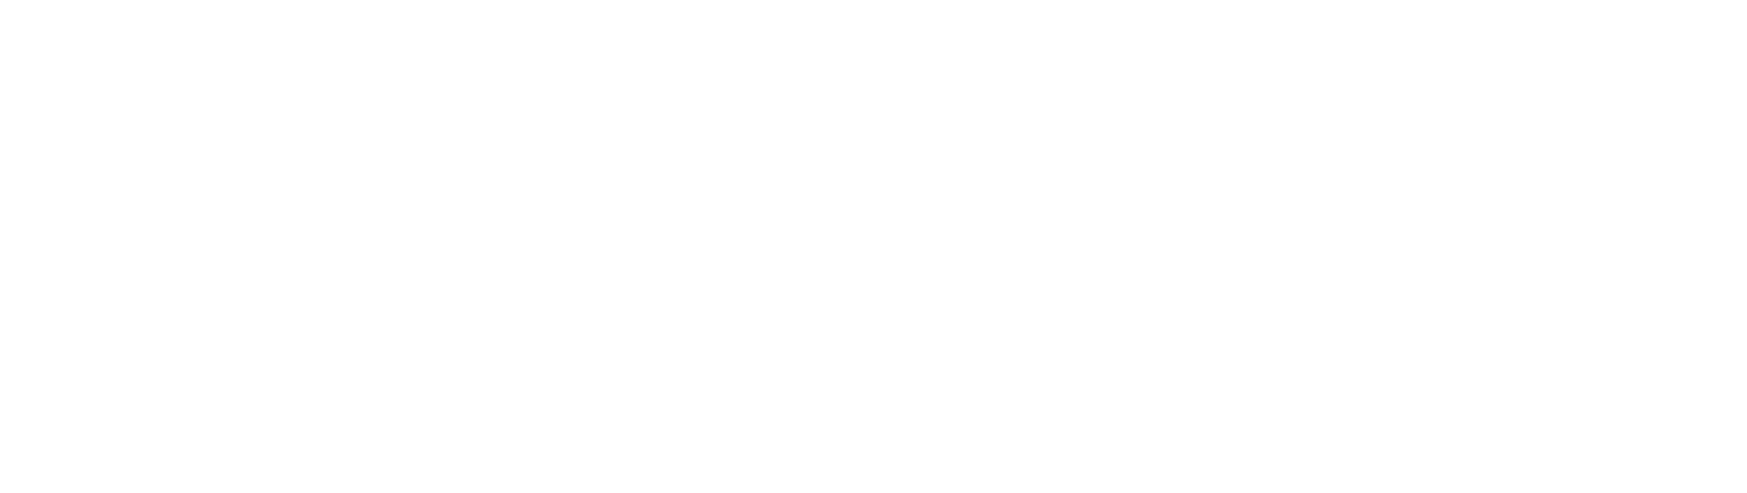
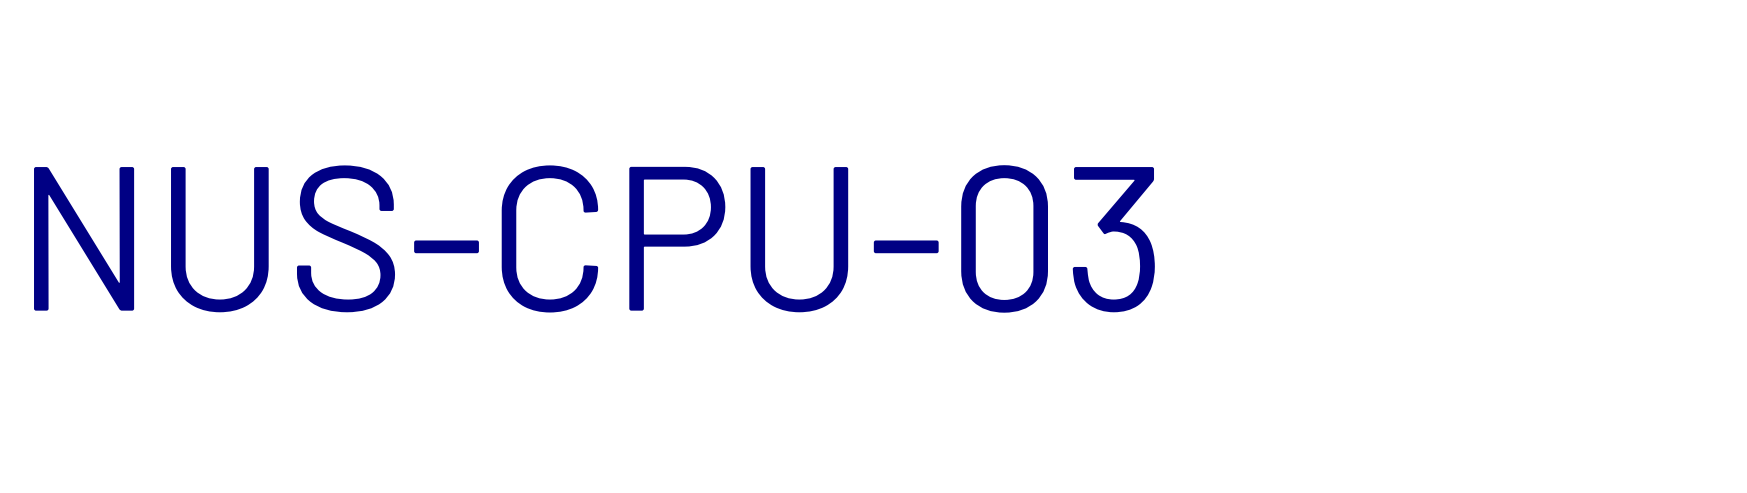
text: none -> NUS-CPU-03 (594, 238)

